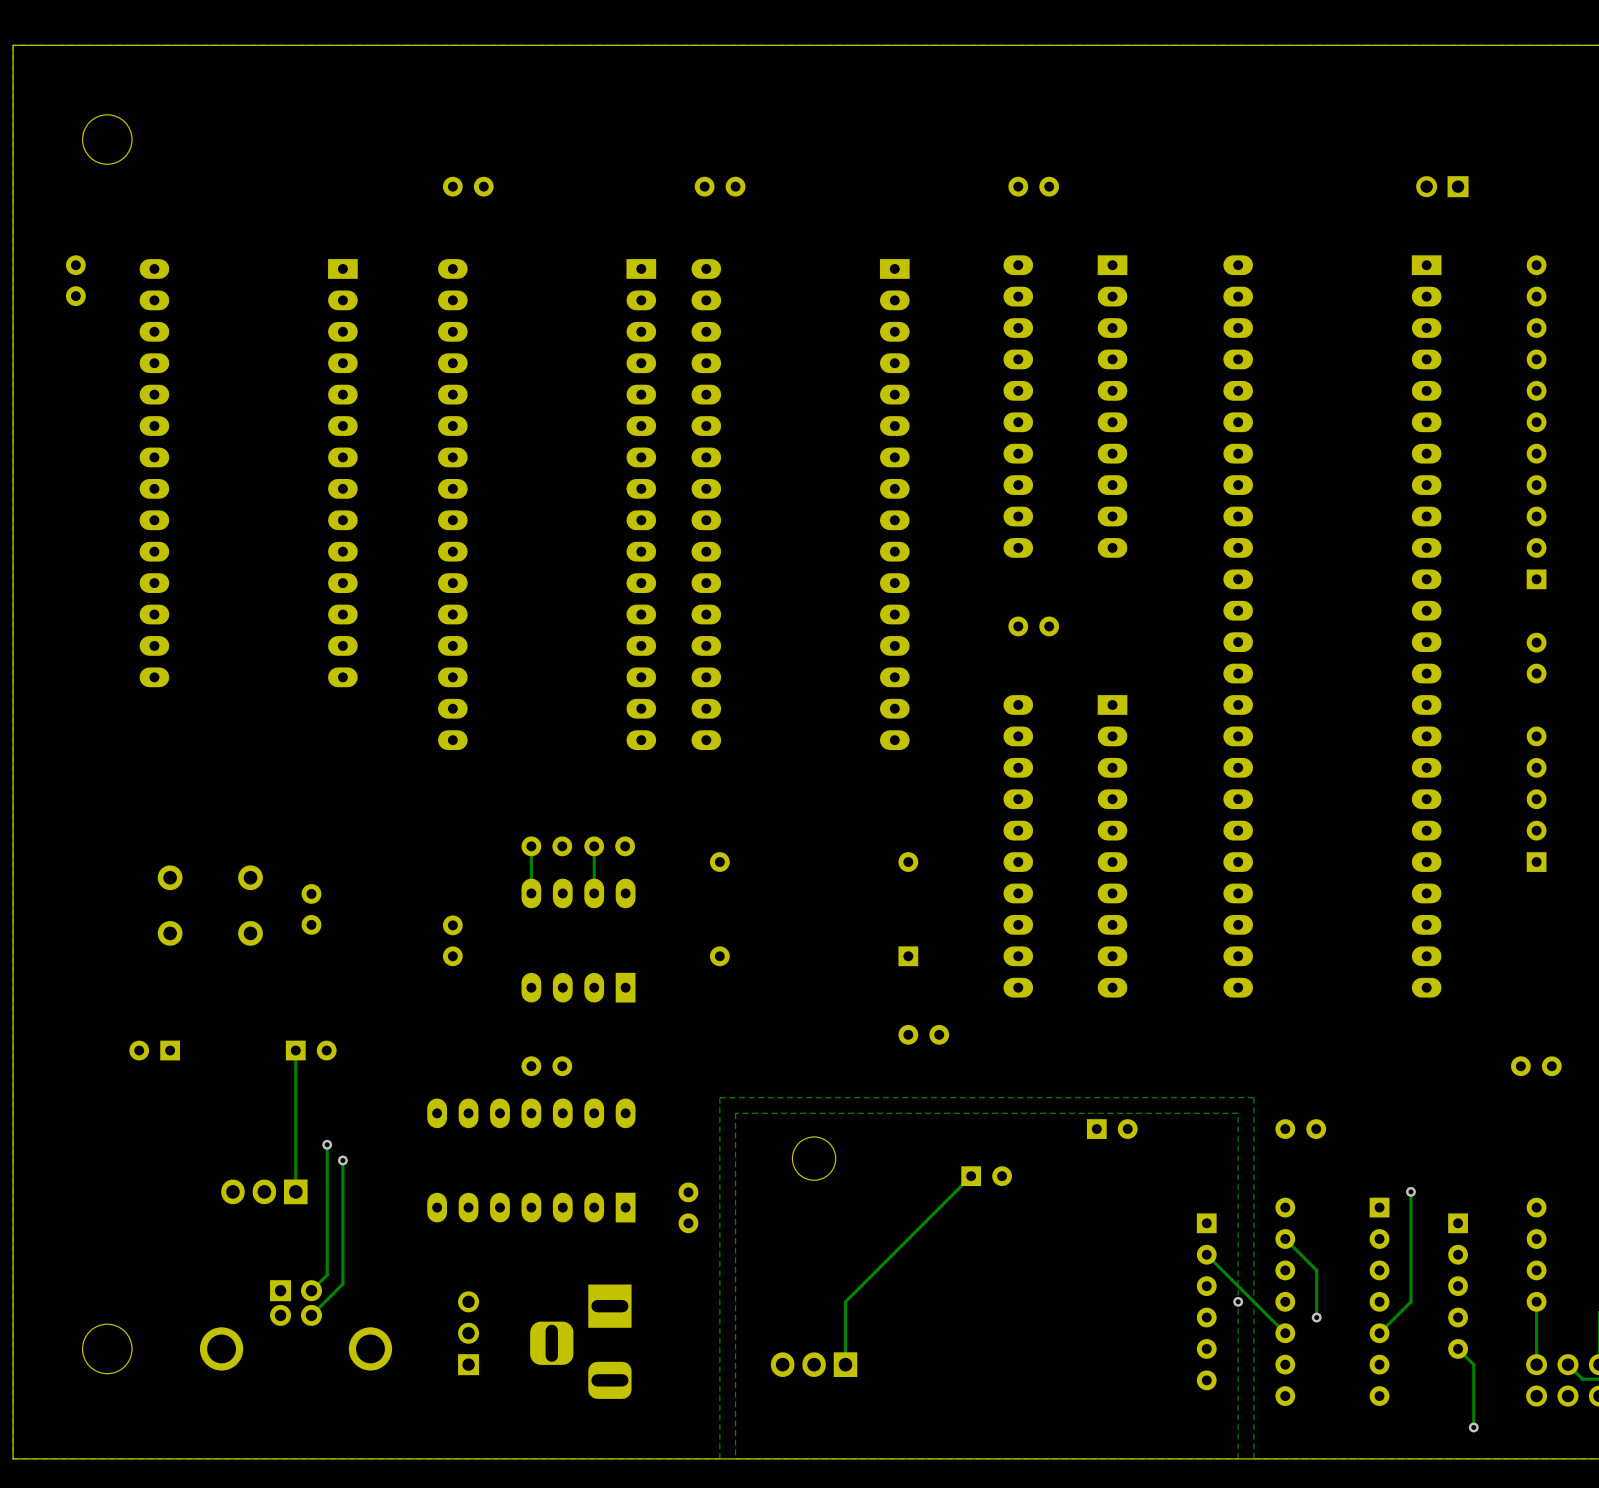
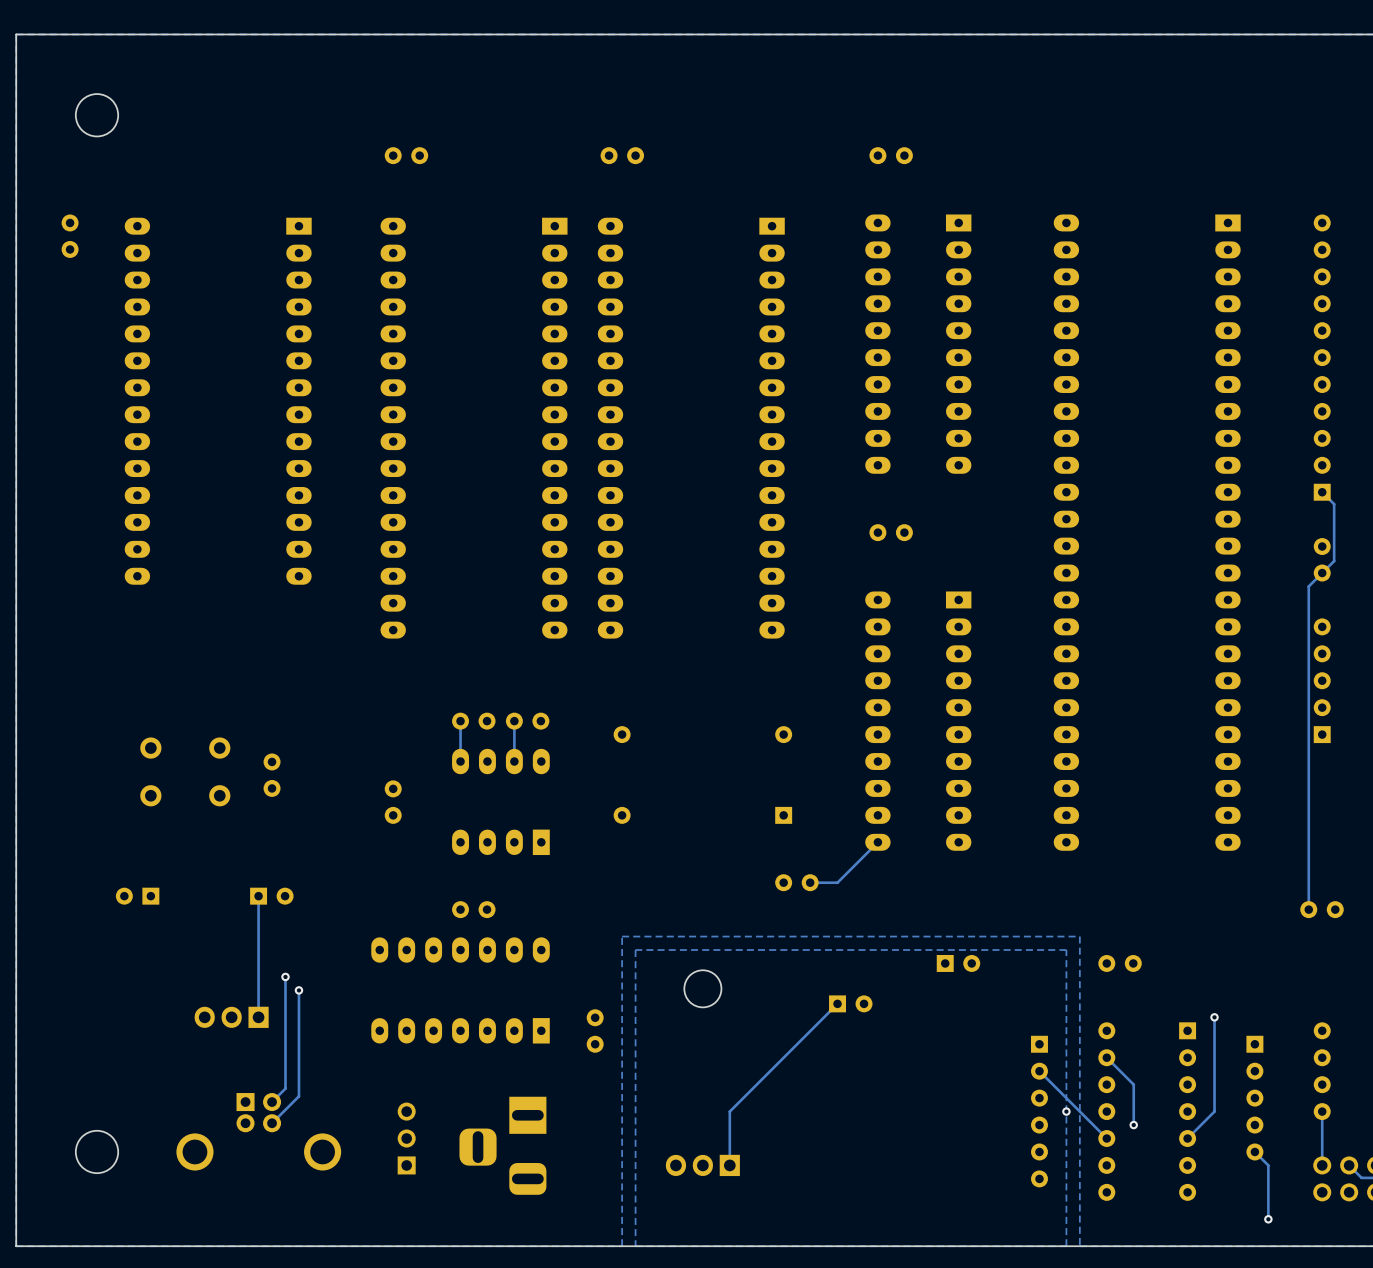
part: (1442, 186) -> none
track: none -> (1322, 492) (1334, 504) (1334, 561) (1308, 586) (1308, 909)
track: none -> (877, 842) (837, 882) (810, 882)

